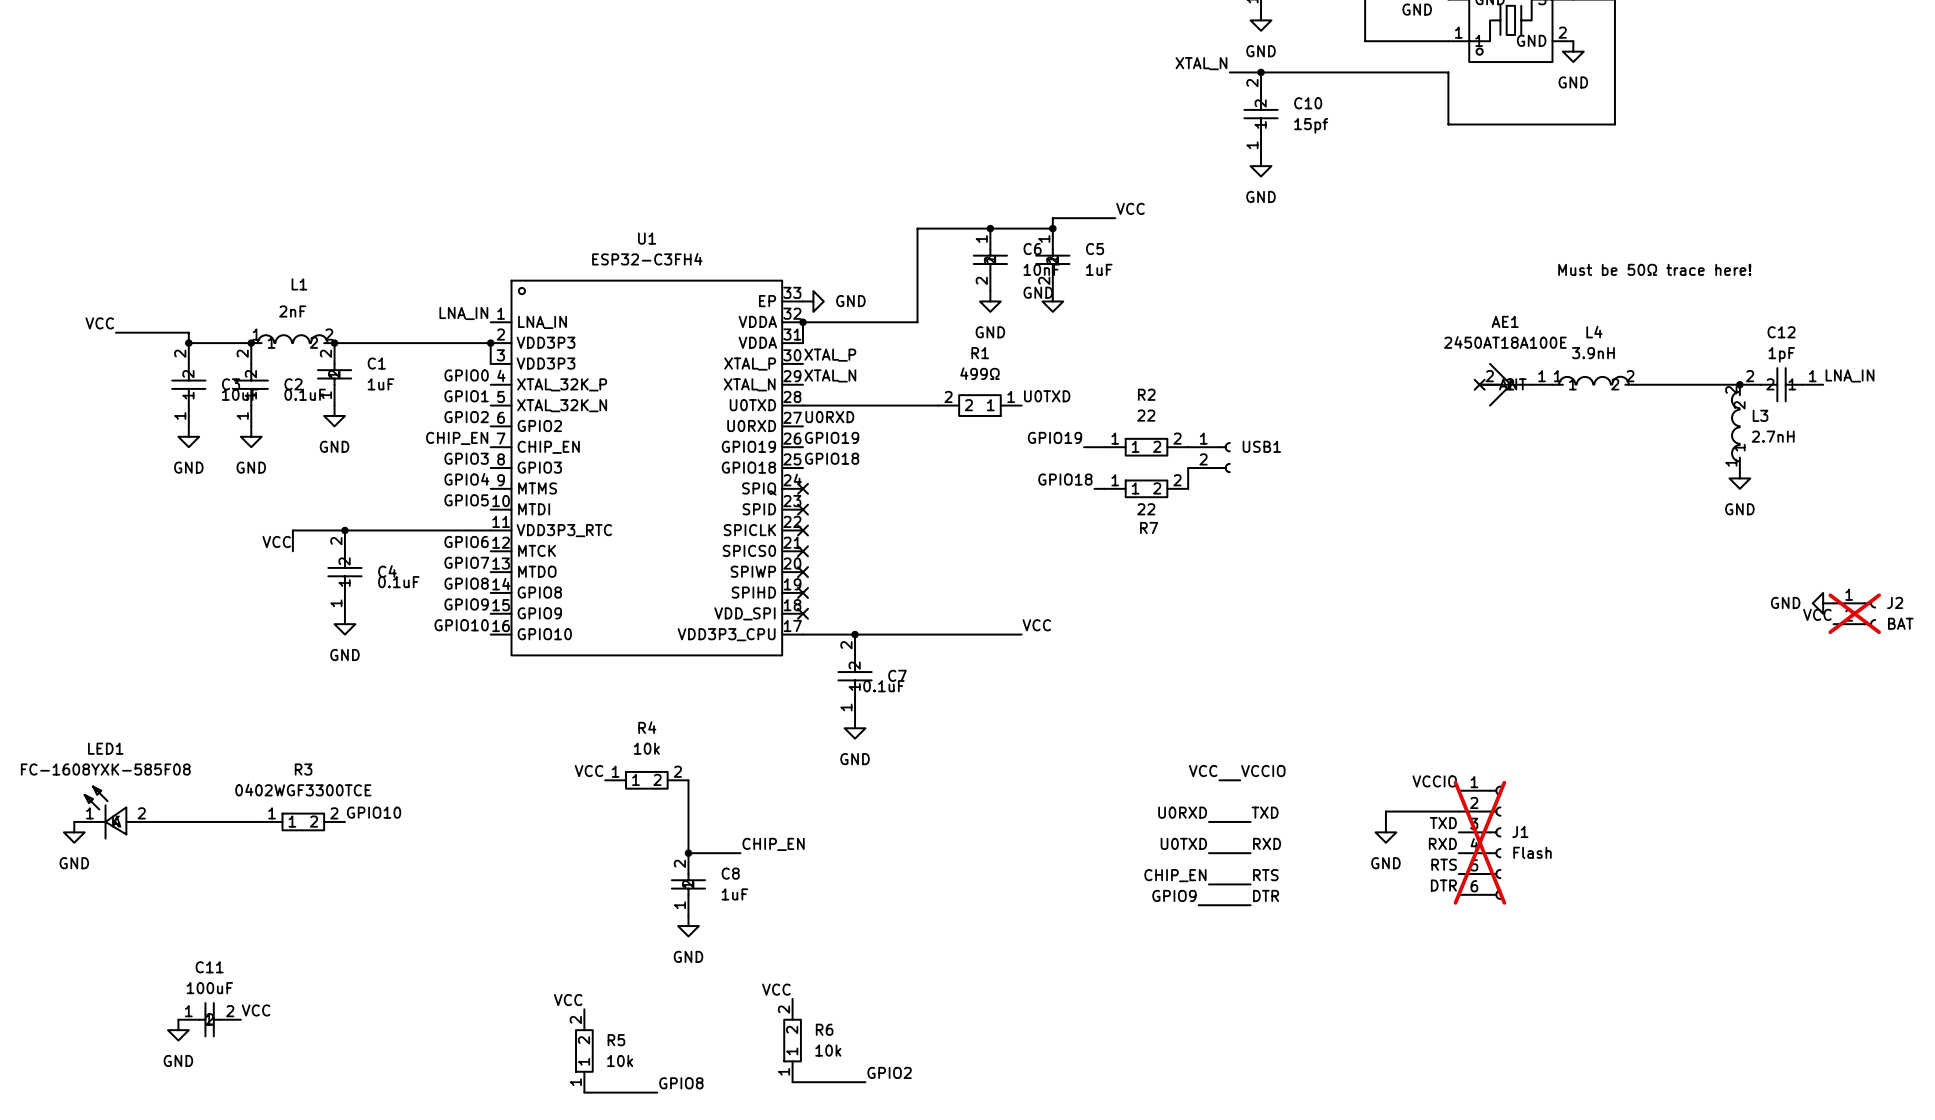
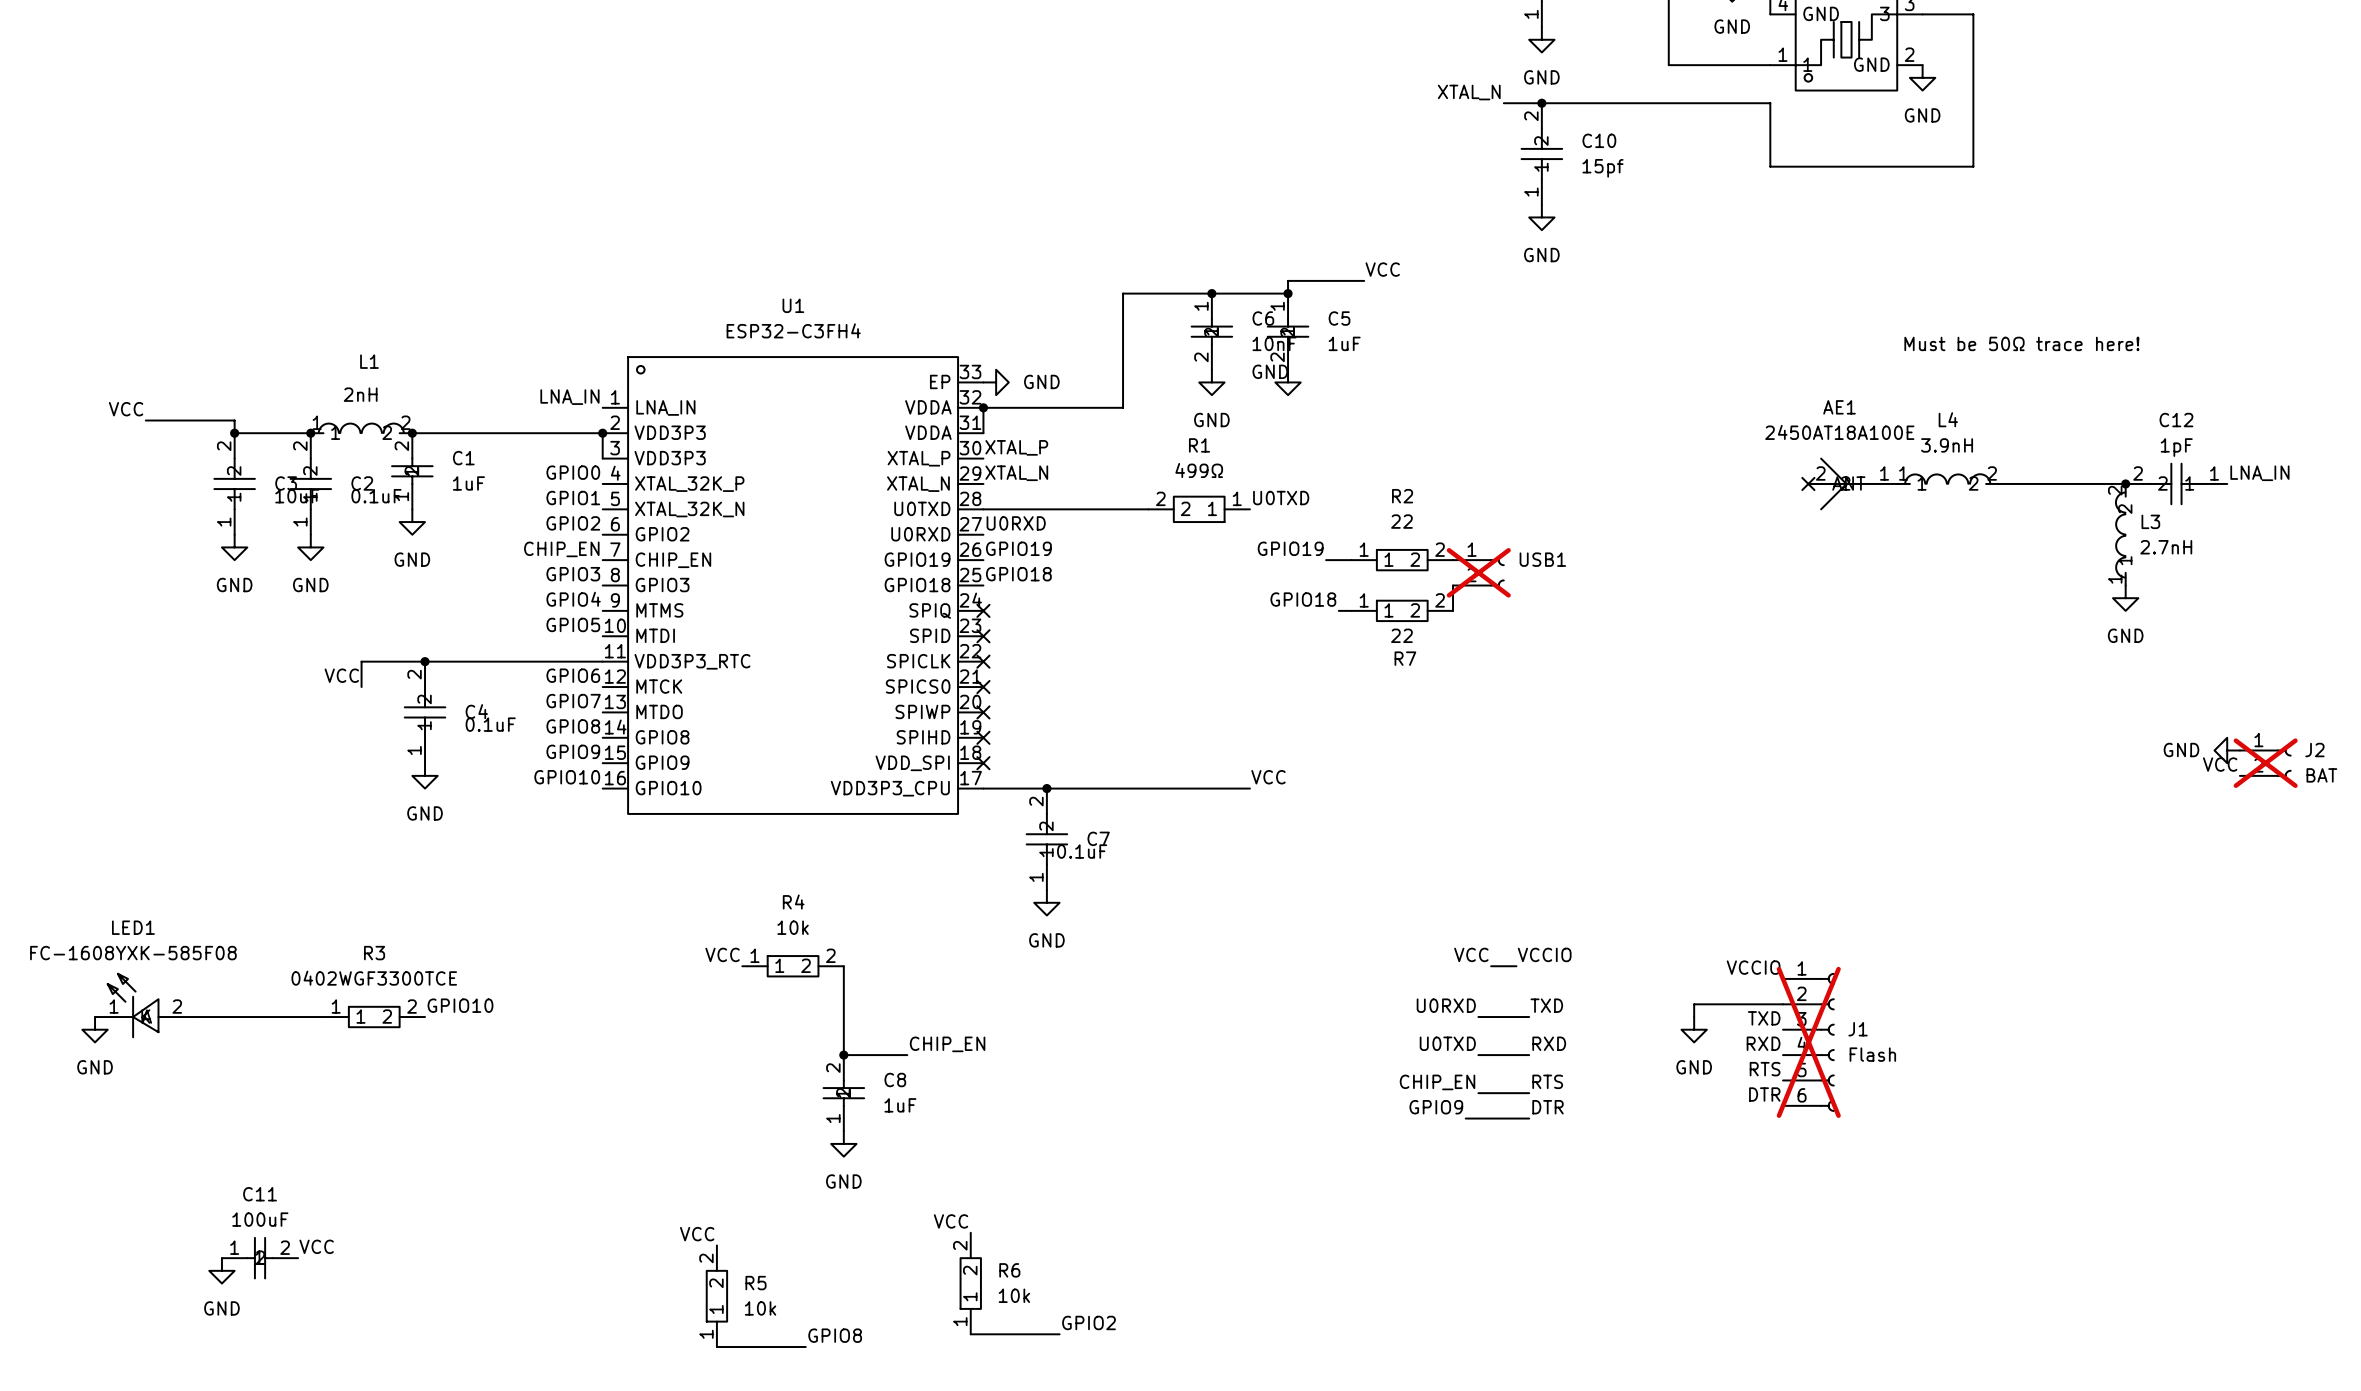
L1 value: 2nF (292, 311) -> 2nH (360, 394)
USB1 do-not-place cross: none -> (1478, 572)

